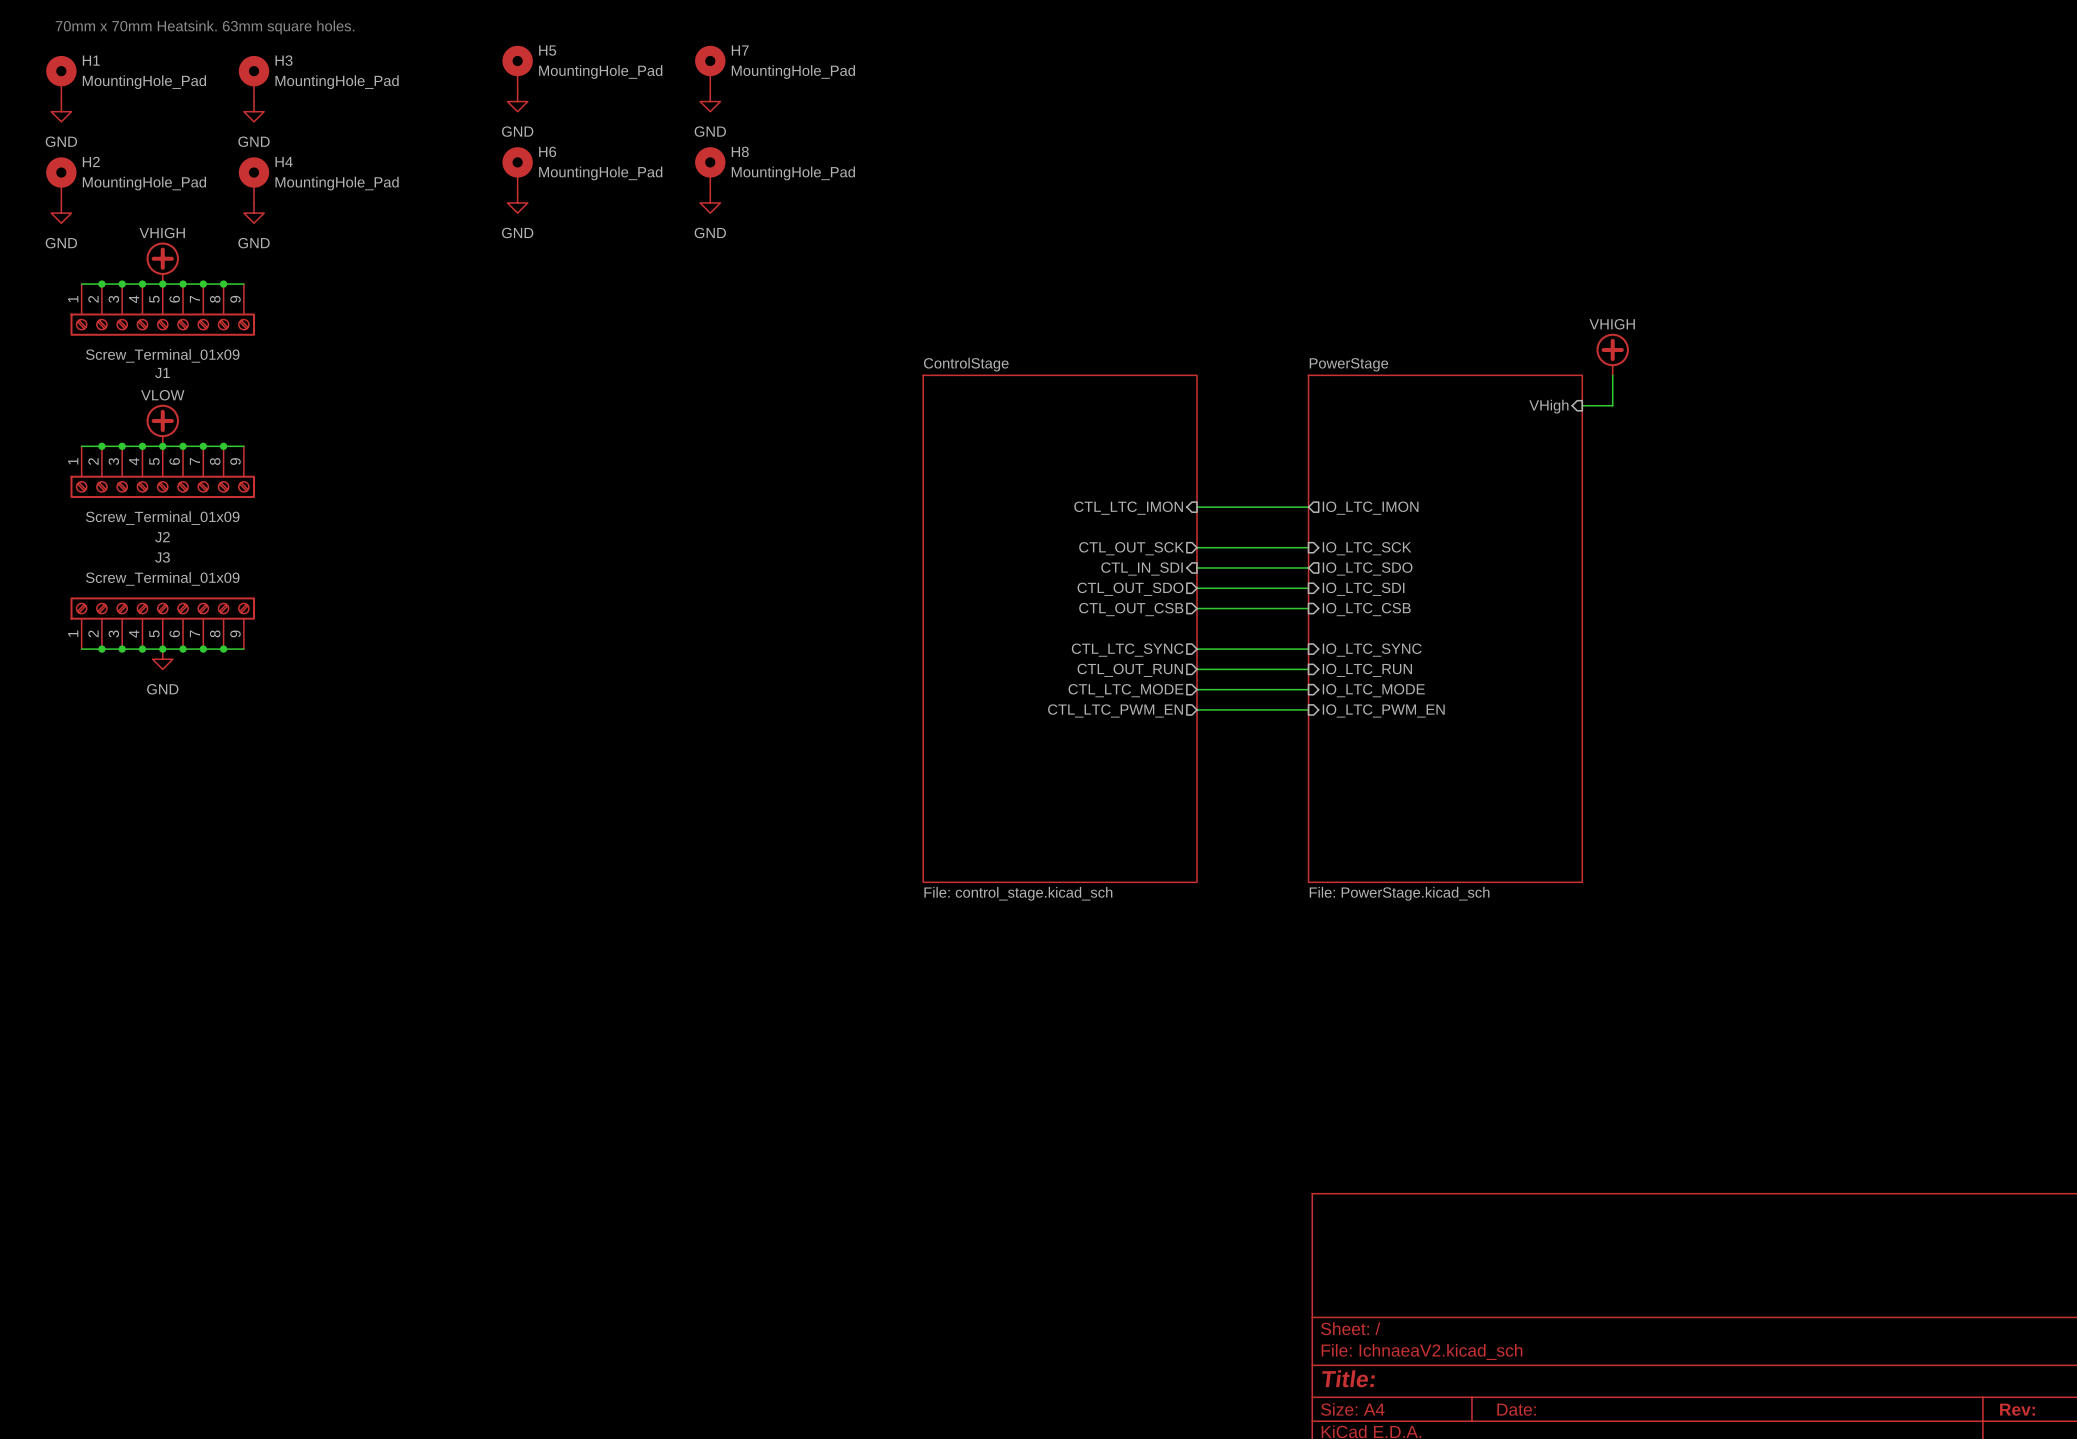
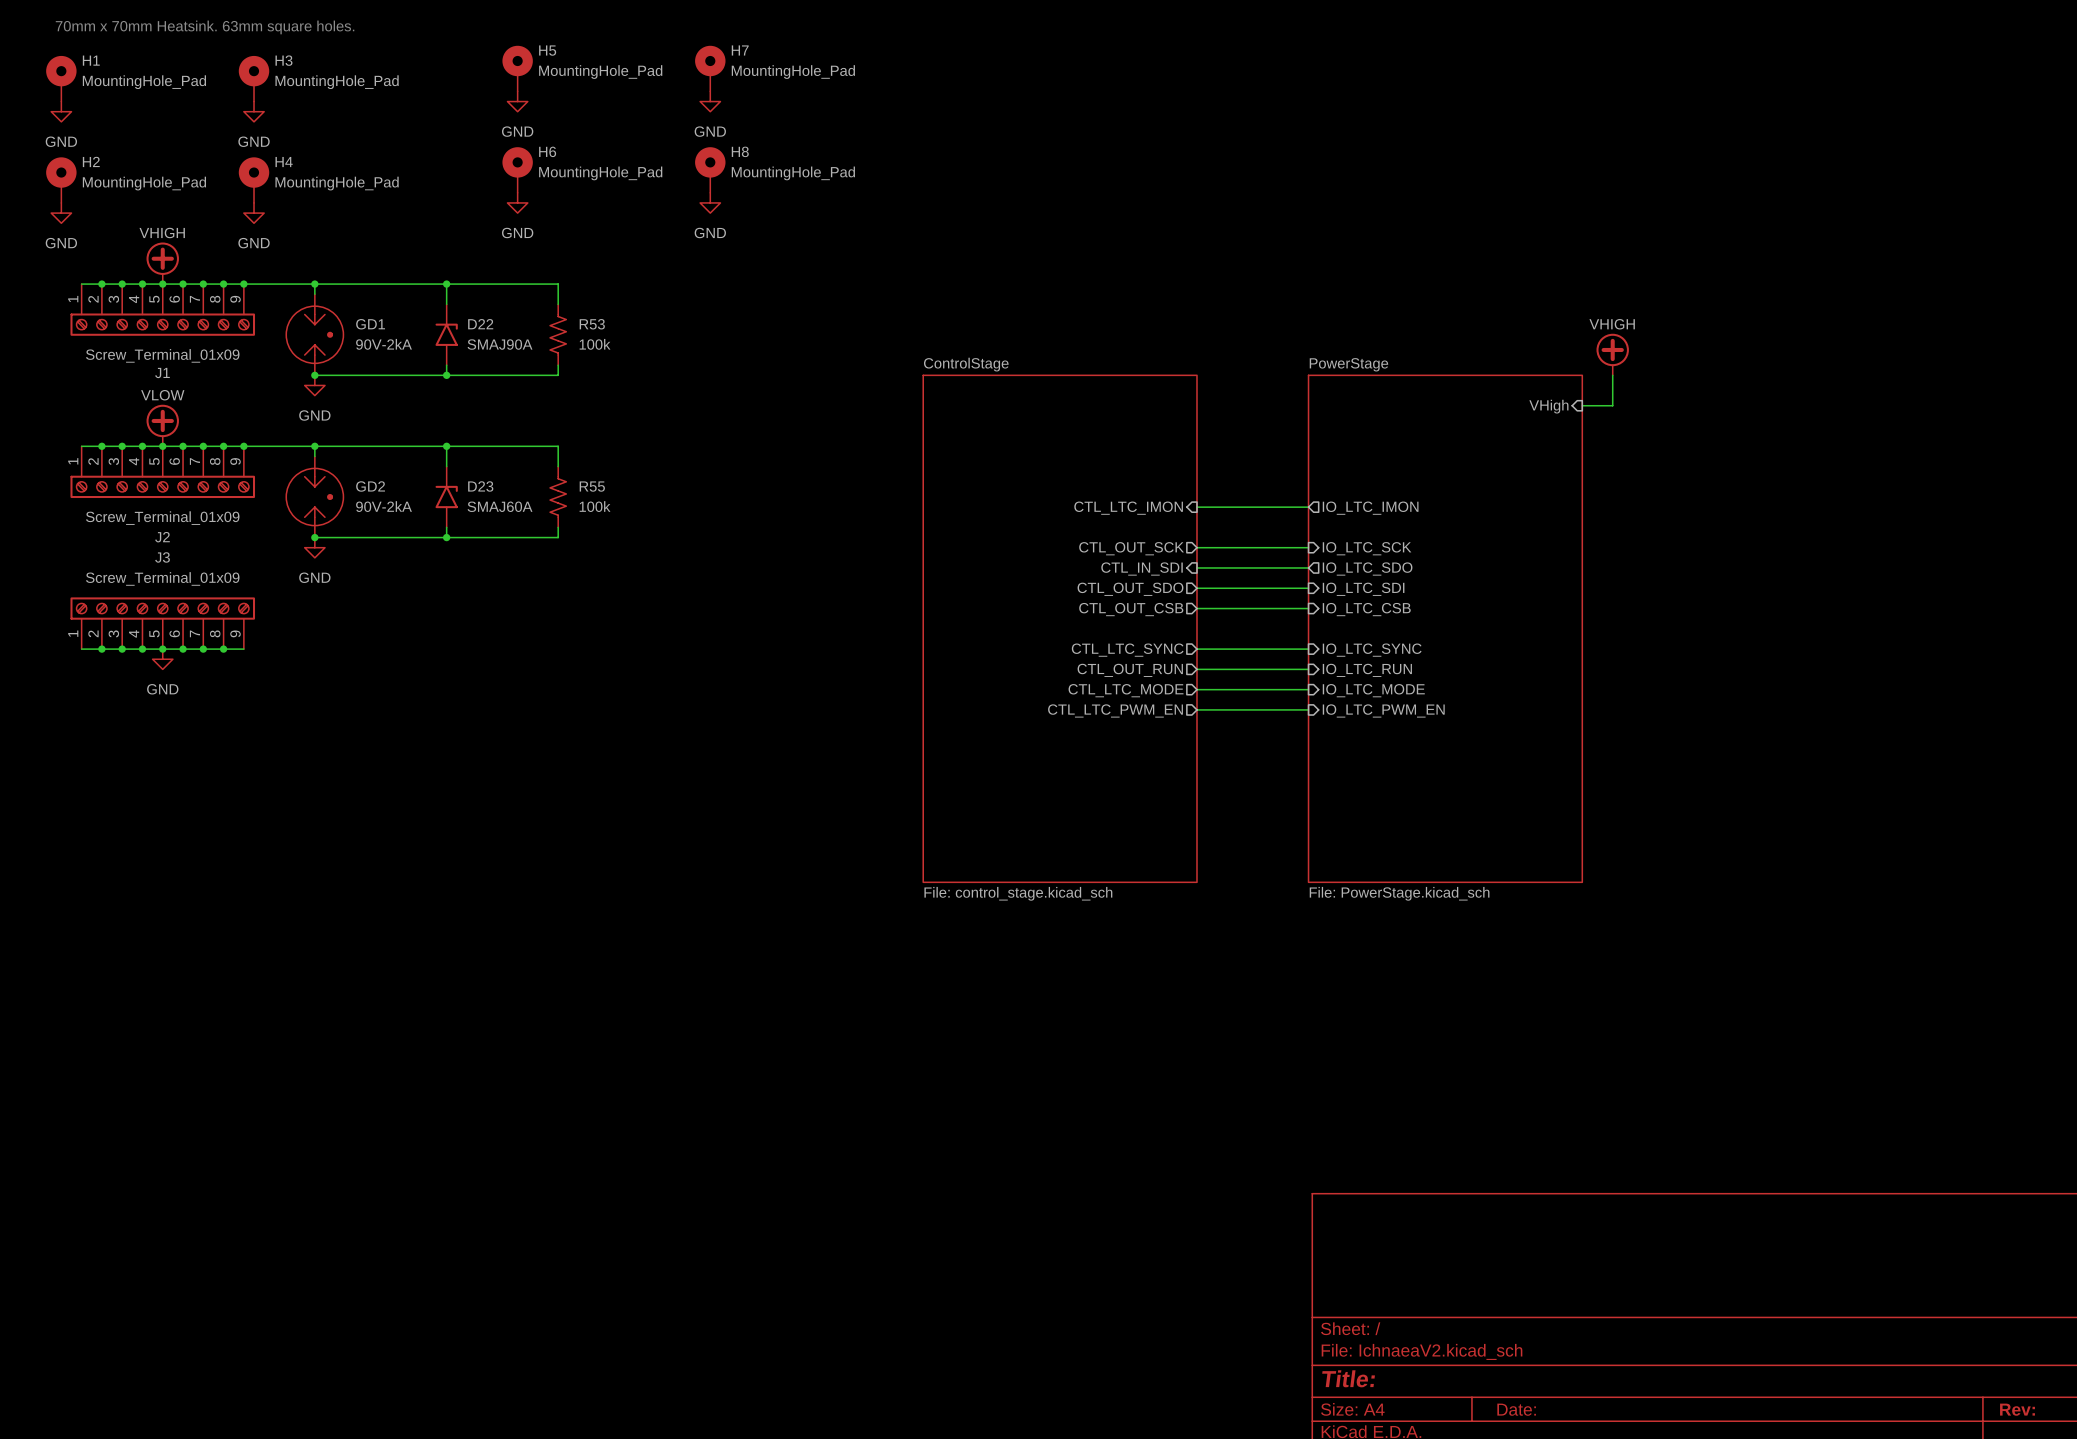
wire: none -> (243, 284) (558, 284) (558, 304)
junction: none -> (243, 284)
wire: none -> (314, 284) (314, 294)
junction: none -> (314, 284)
wire: none -> (446, 284) (446, 304)
junction: none -> (446, 284)
GD1: none -> 90V-2kA (314, 334)
D22: none -> SMAJ90A (446, 334)
R53: none -> 100k (558, 334)
wire: none -> (446, 365) (446, 375)
wire: none -> (558, 365) (558, 375) (314, 375)
junction: none -> (314, 375)
junction: none -> (446, 375)
power symbol: none -> GND (314, 385)
wire: none -> (243, 446) (558, 446) (558, 466)
junction: none -> (243, 446)
wire: none -> (314, 446) (314, 456)
junction: none -> (314, 446)
wire: none -> (446, 446) (446, 466)
junction: none -> (446, 446)
GD2: none -> 90V-2kA (314, 497)
D23: none -> SMAJ60A (446, 497)
R55: none -> 100k (558, 497)
wire: none -> (446, 527) (446, 537)
wire: none -> (558, 527) (558, 537) (314, 537)
junction: none -> (314, 537)
junction: none -> (446, 537)
power symbol: none -> GND (314, 547)

